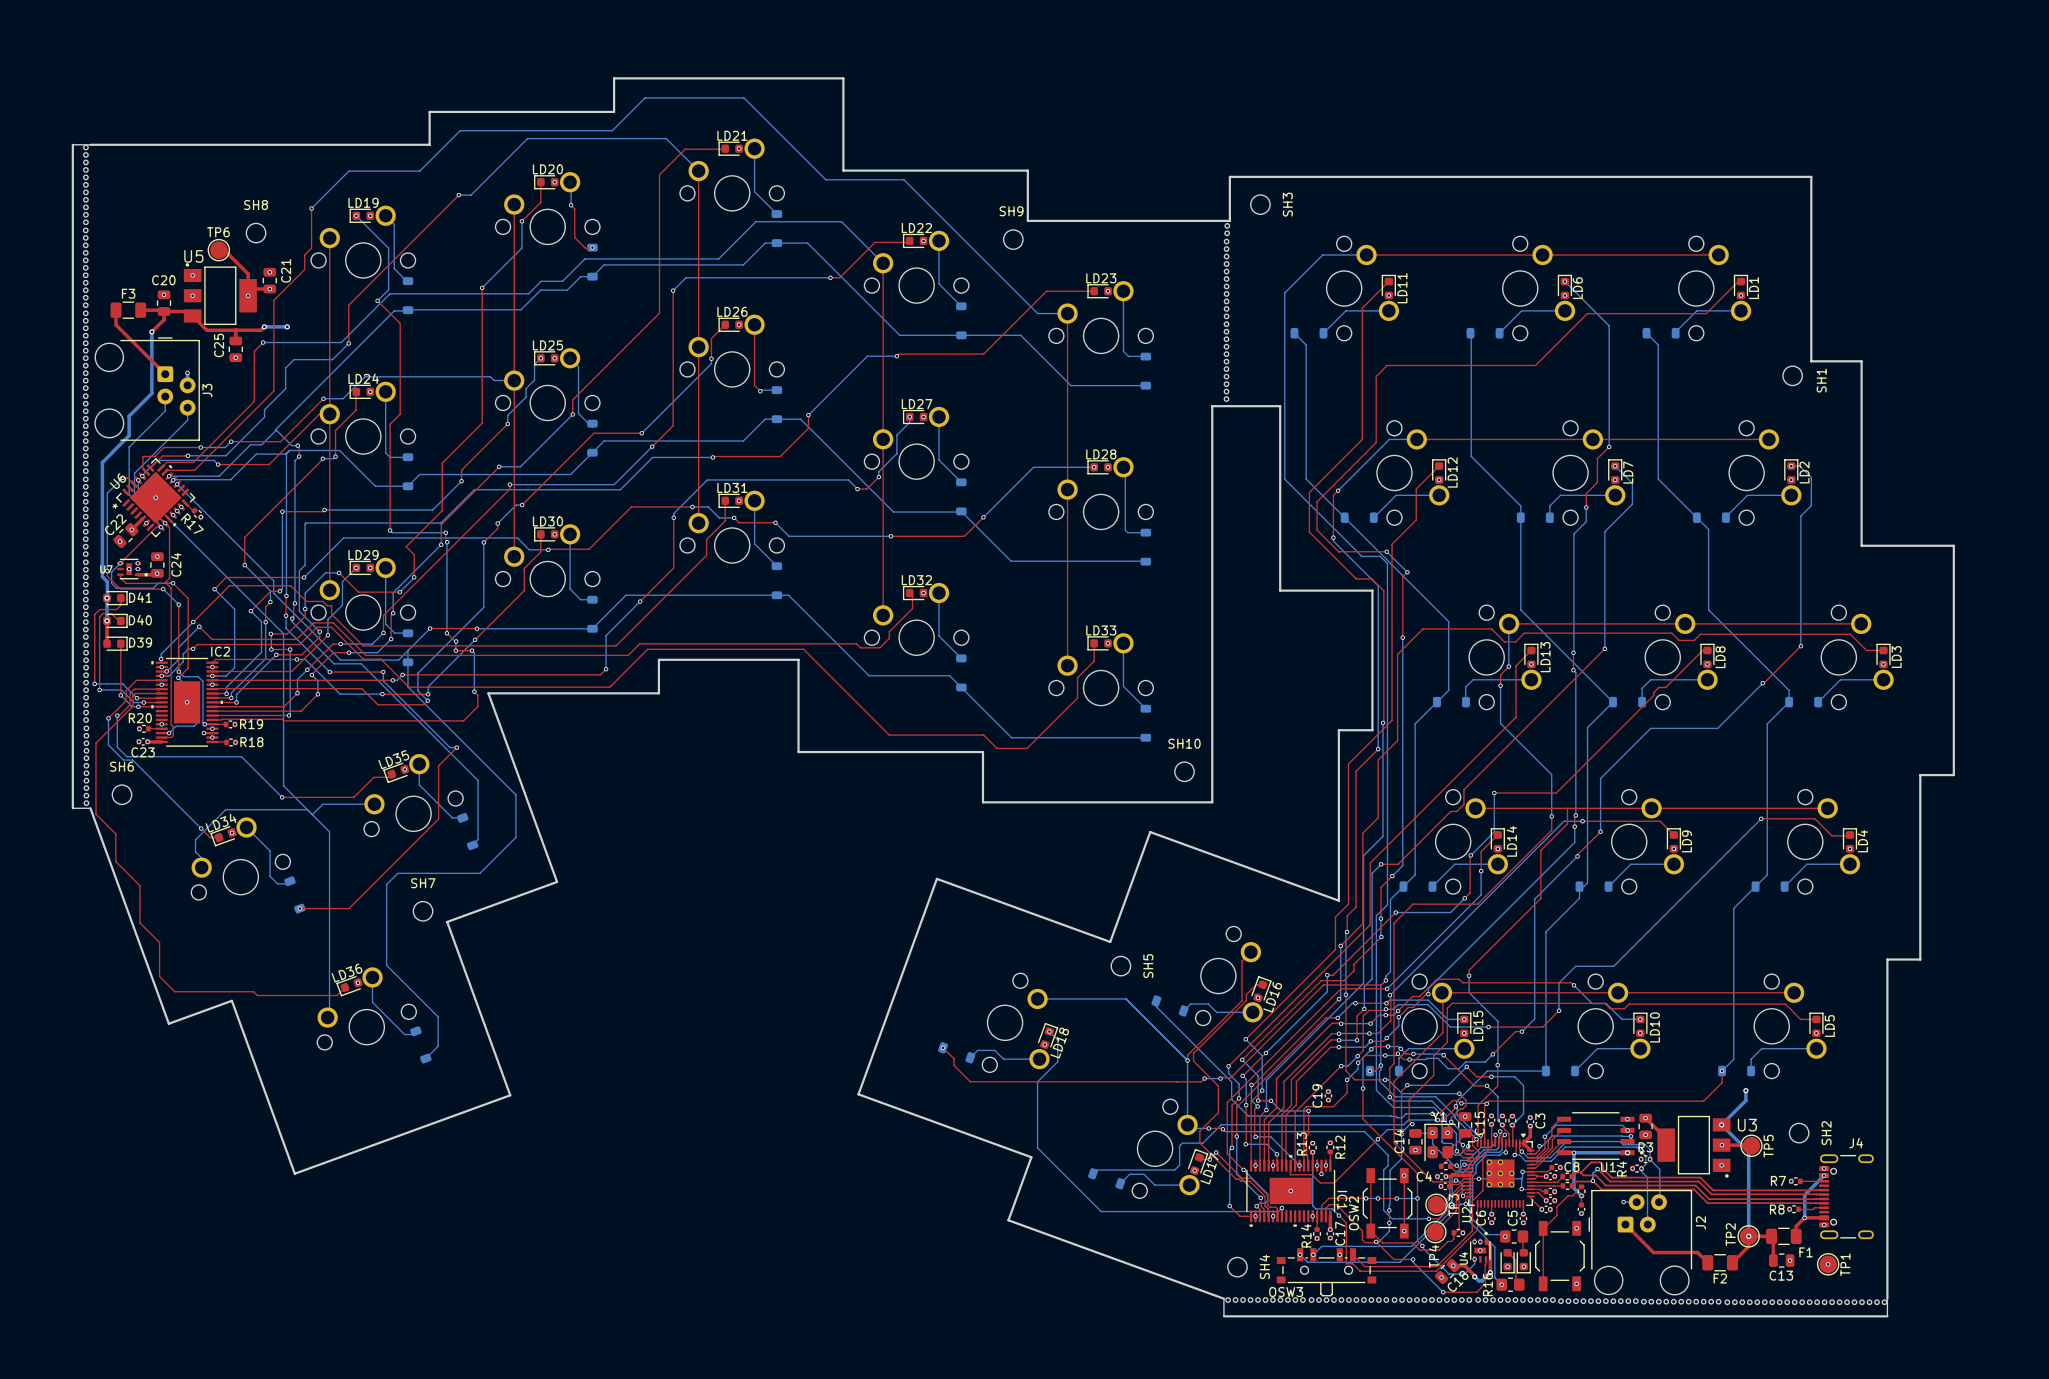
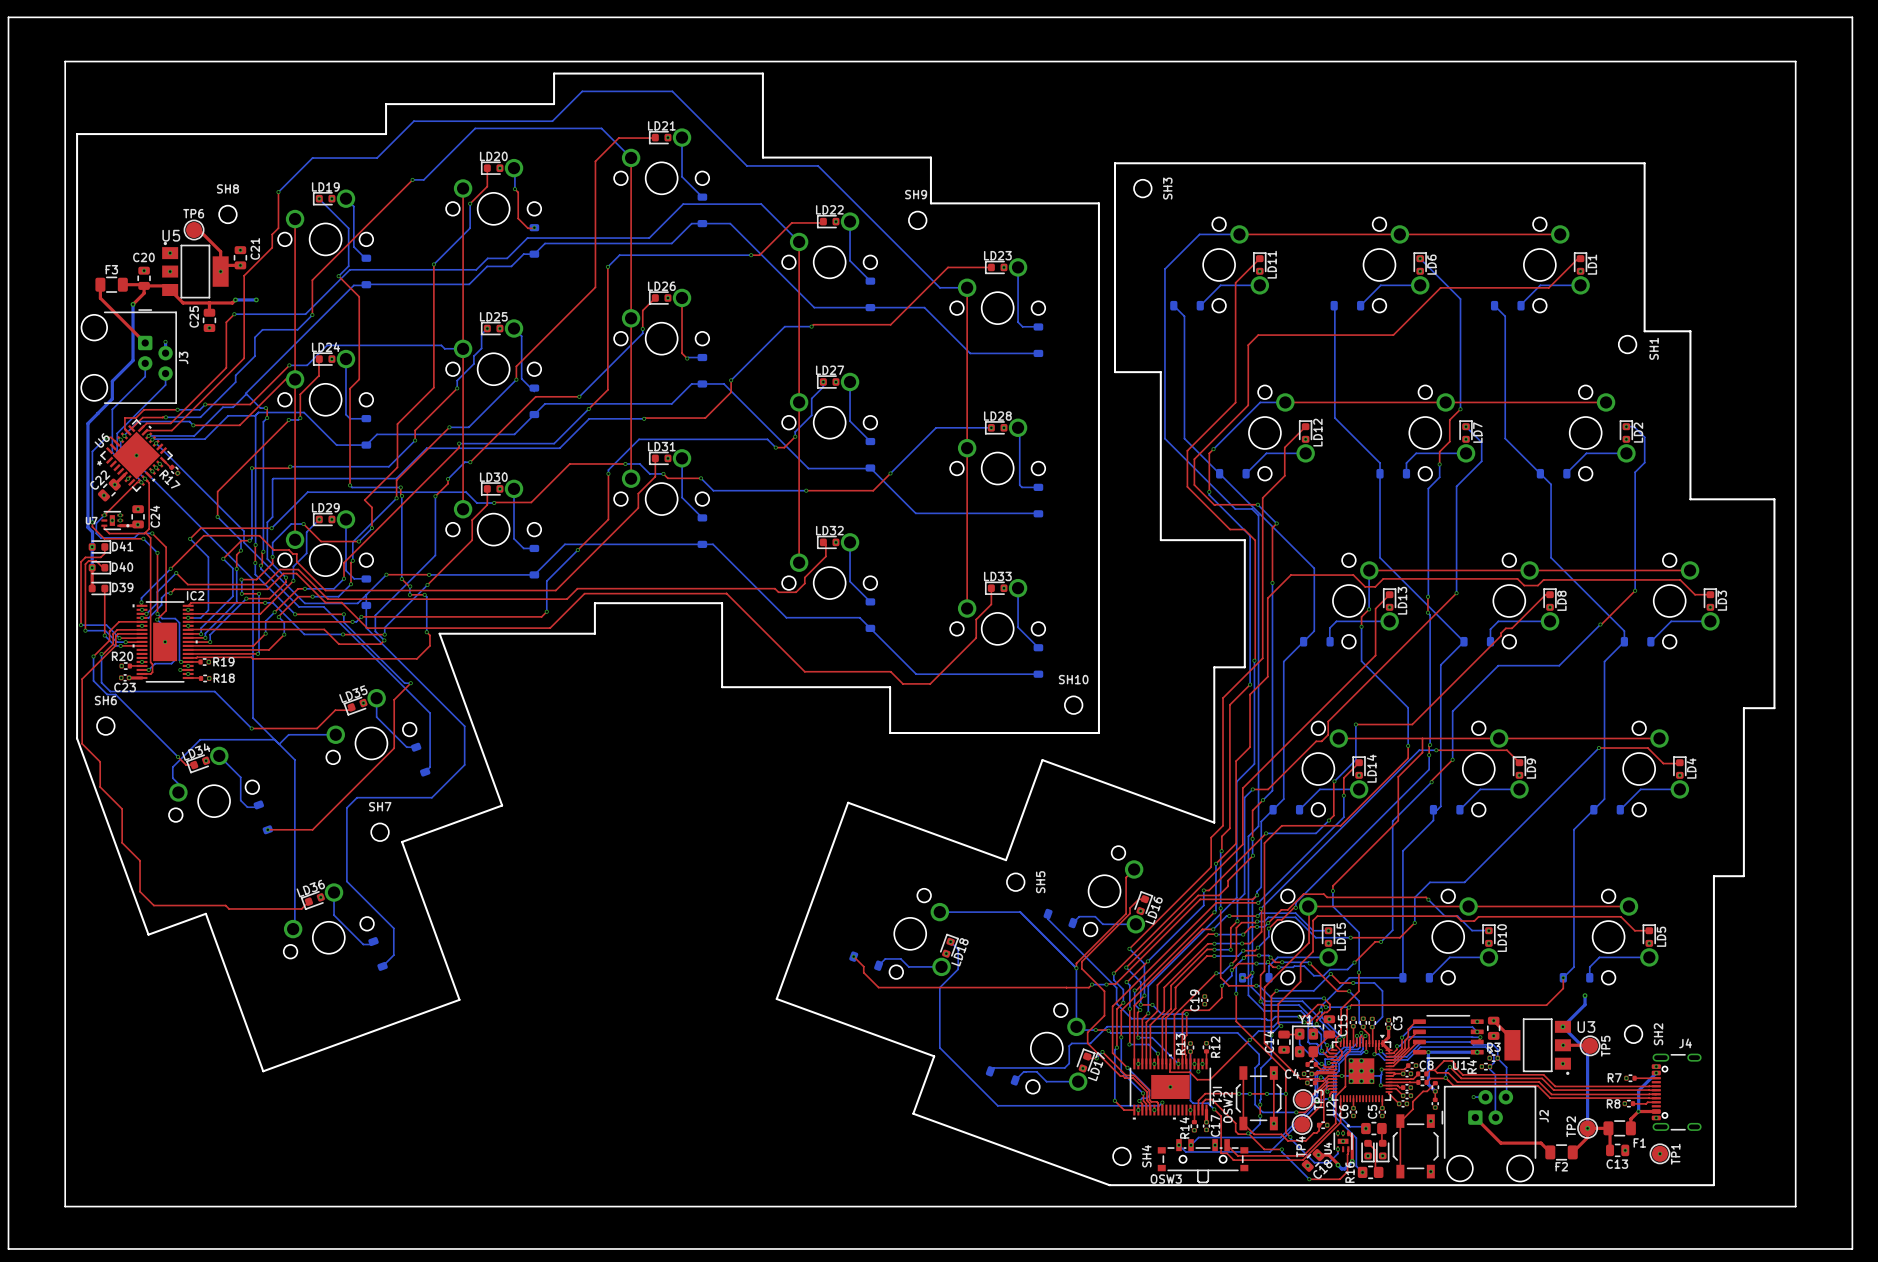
board edge: none -> (8, 17) (1852, 17) (1852, 1248) (8, 1248) (8, 17)
board edge: none -> (65, 61) (1795, 61) (1795, 1206) (65, 1206) (65, 61)
board edge: (90, 144) (72, 144) (72, 808) (90, 808) -> (77, 134) (77, 738)
part: (85, 184) -> none
board edge: (1212, 220) (1229, 220) -> (1098, 203) (1098, 372)
part: (1227, 225) -> none
part: (1227, 233) -> none
part: (85, 267) -> none
part: (1226, 278) -> none
part: (85, 350) -> none
part: (1226, 361) -> none
board edge: (1212, 406) (1229, 406) -> (1114, 203) (1114, 372)
part: (85, 433) -> none
part: (85, 516) -> none
part: (85, 599) -> none
part: (86, 682) -> none
part: (86, 765) -> none
board edge: (1223, 1298) (1223, 1316) (1887, 1316) (1887, 1298) -> (1109, 1185) (1713, 1185)
part: (1265, 1300) -> none
part: (1348, 1300) -> none
part: (1431, 1300) -> none
part: (1515, 1300) -> none
part: (1598, 1301) -> none
part: (1681, 1301) -> none
part: (1764, 1302) -> none
part: (1847, 1302) -> none

